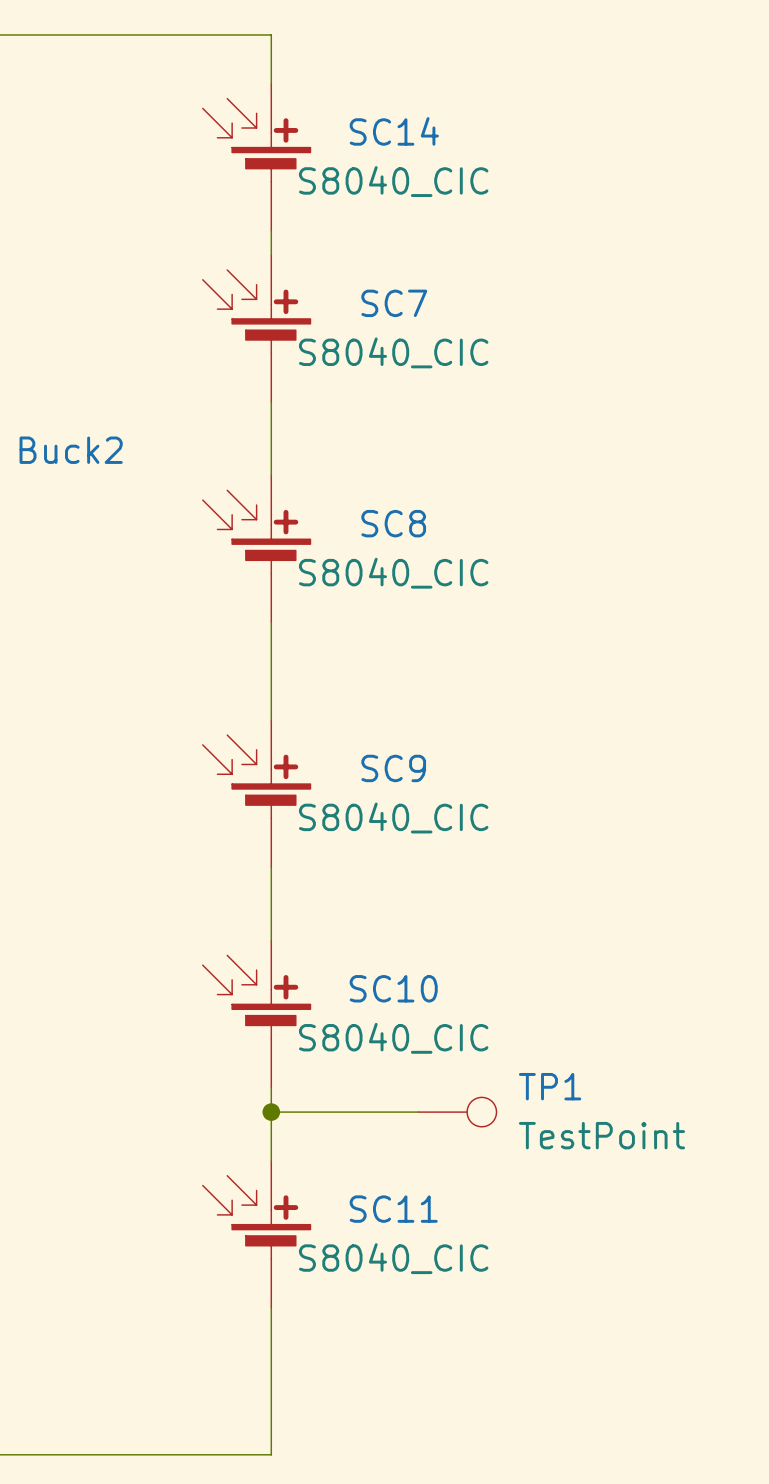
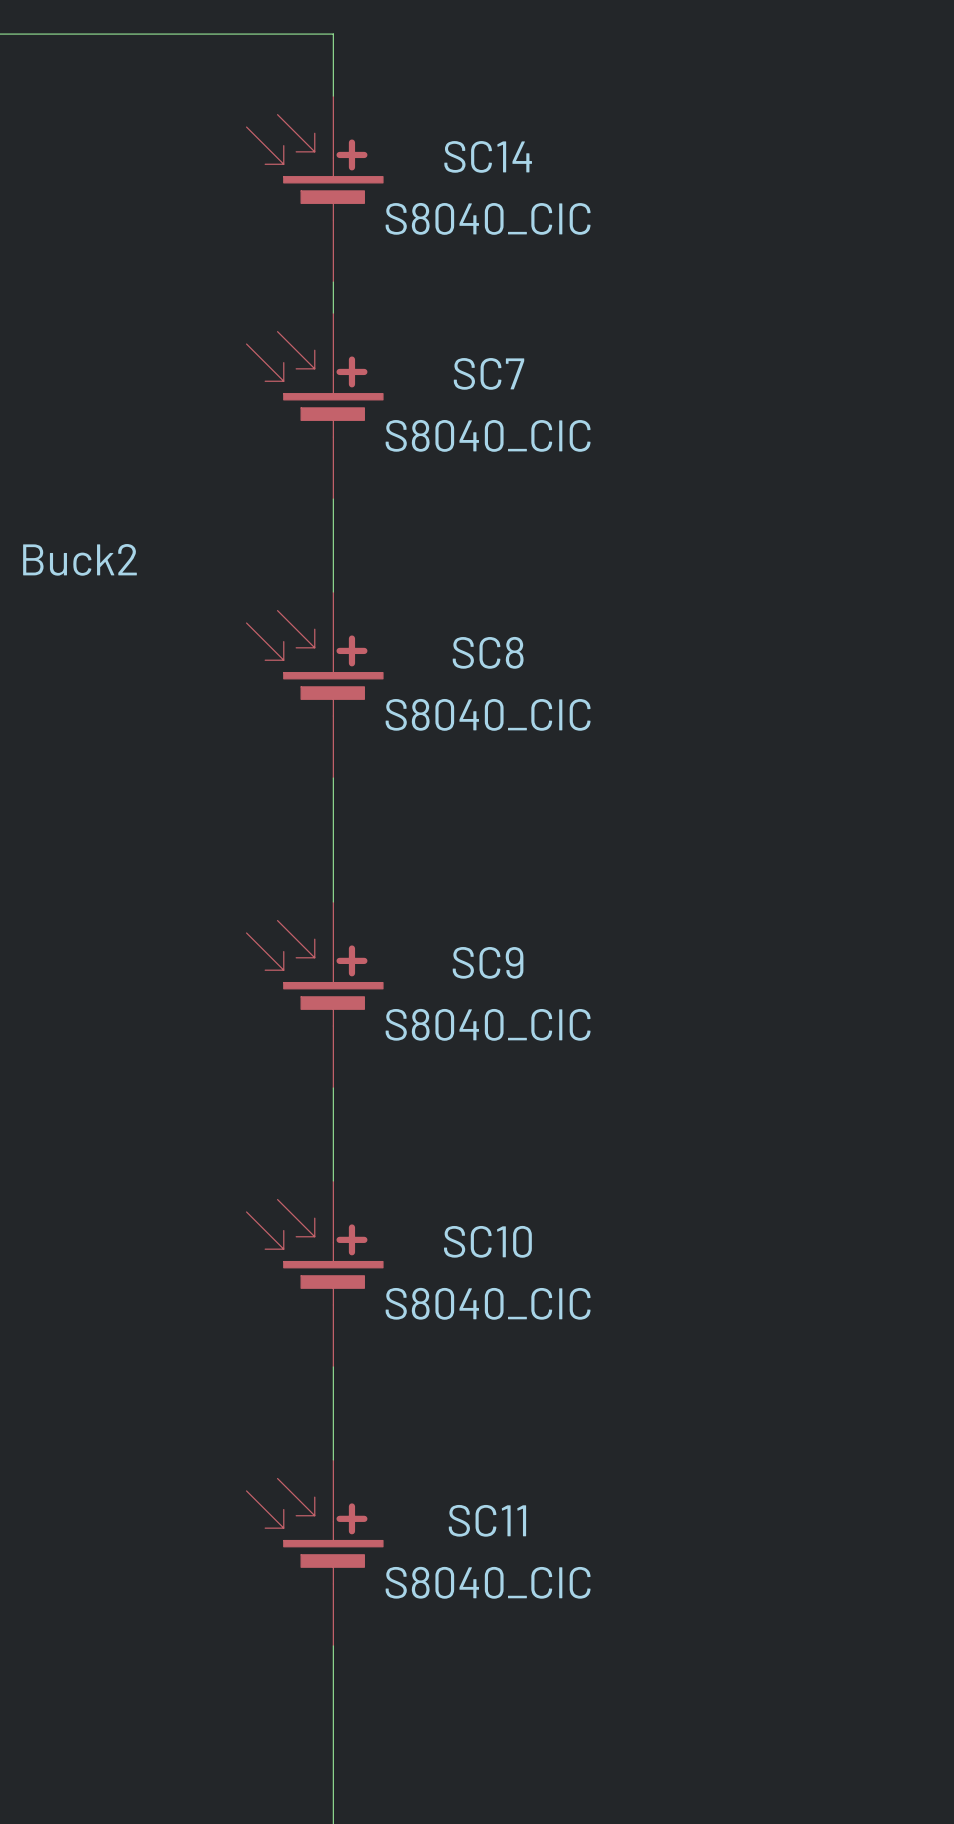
wire: (271, 1112) (418, 1112) -> none
junction: (271, 1112) -> none
TP1: TestPoint (457, 1112) -> none

